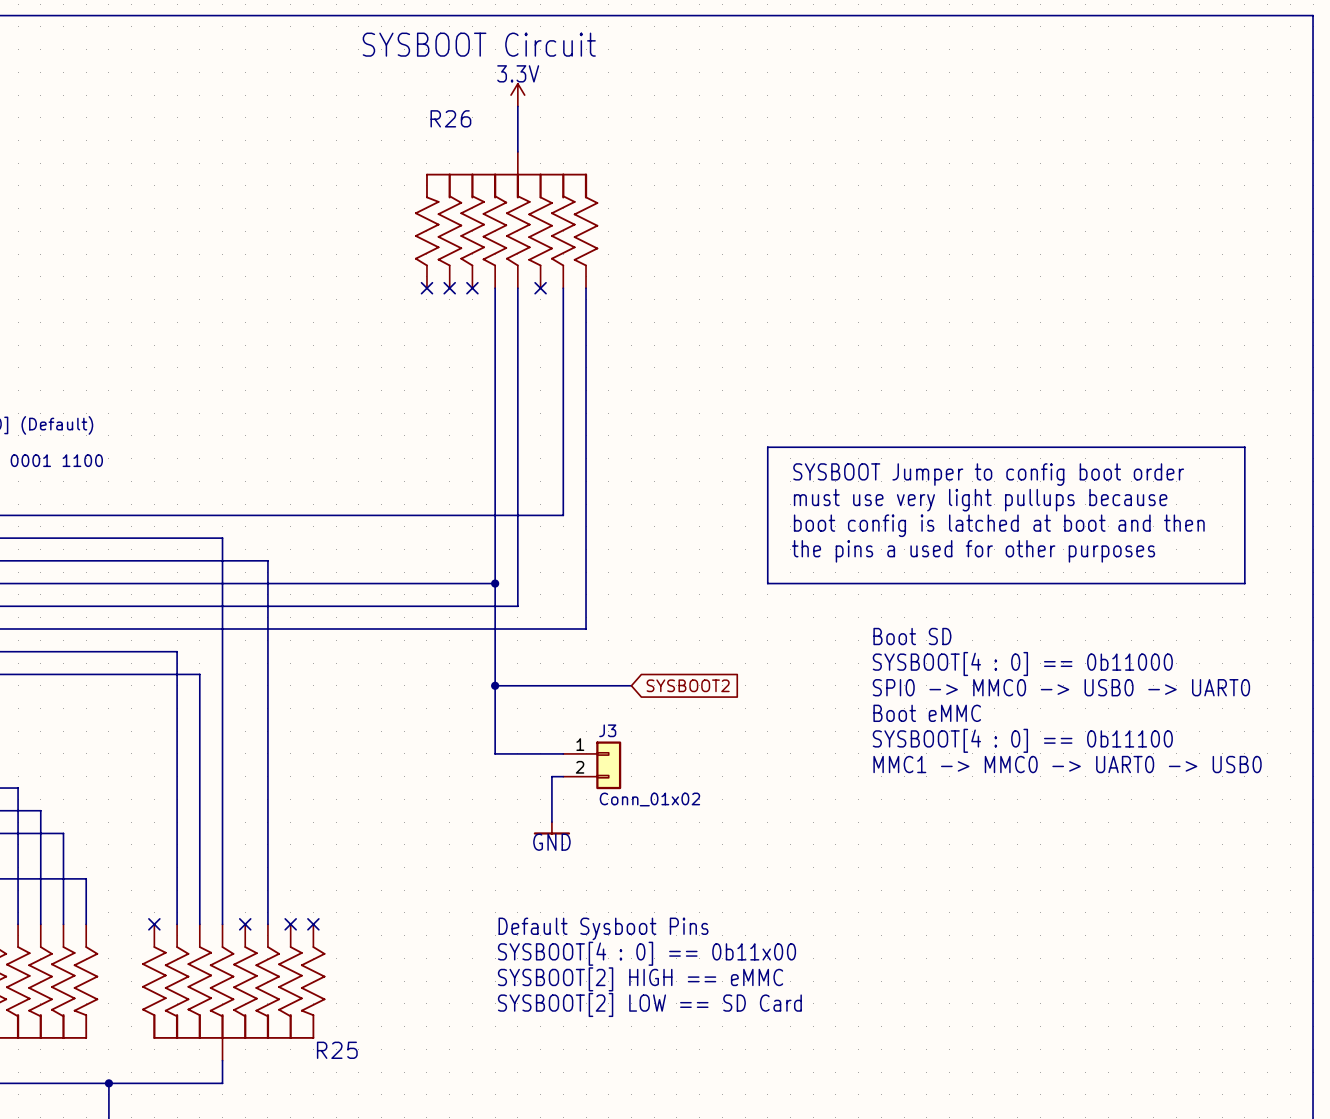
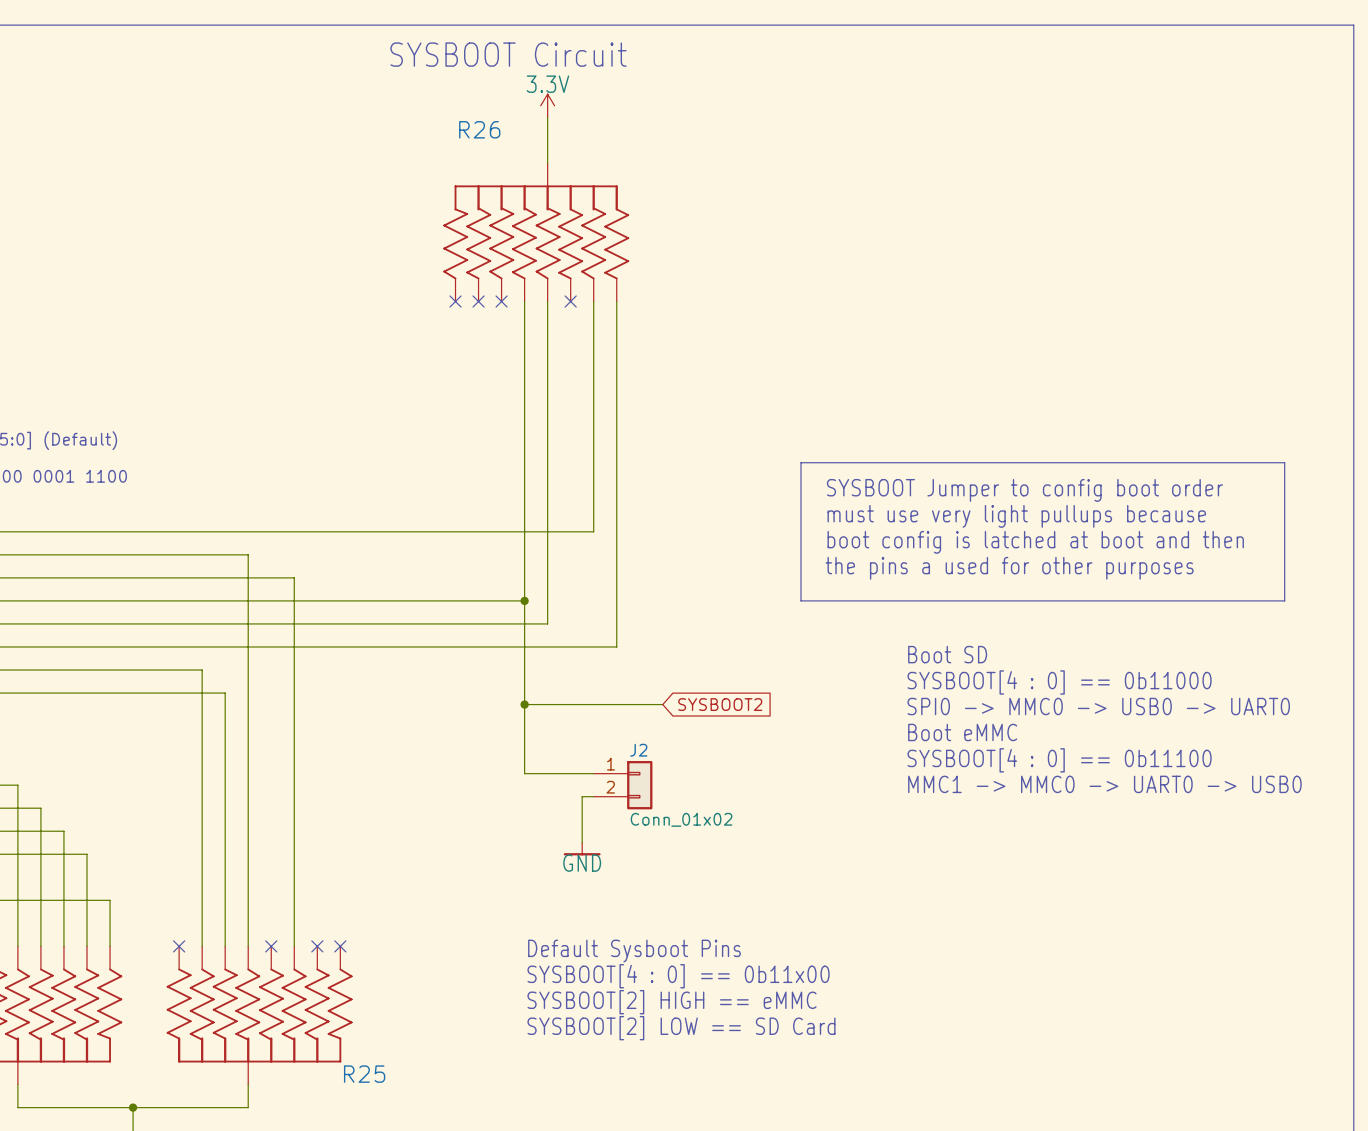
J3 name: J3 (607, 730) -> J2 (638, 750)

